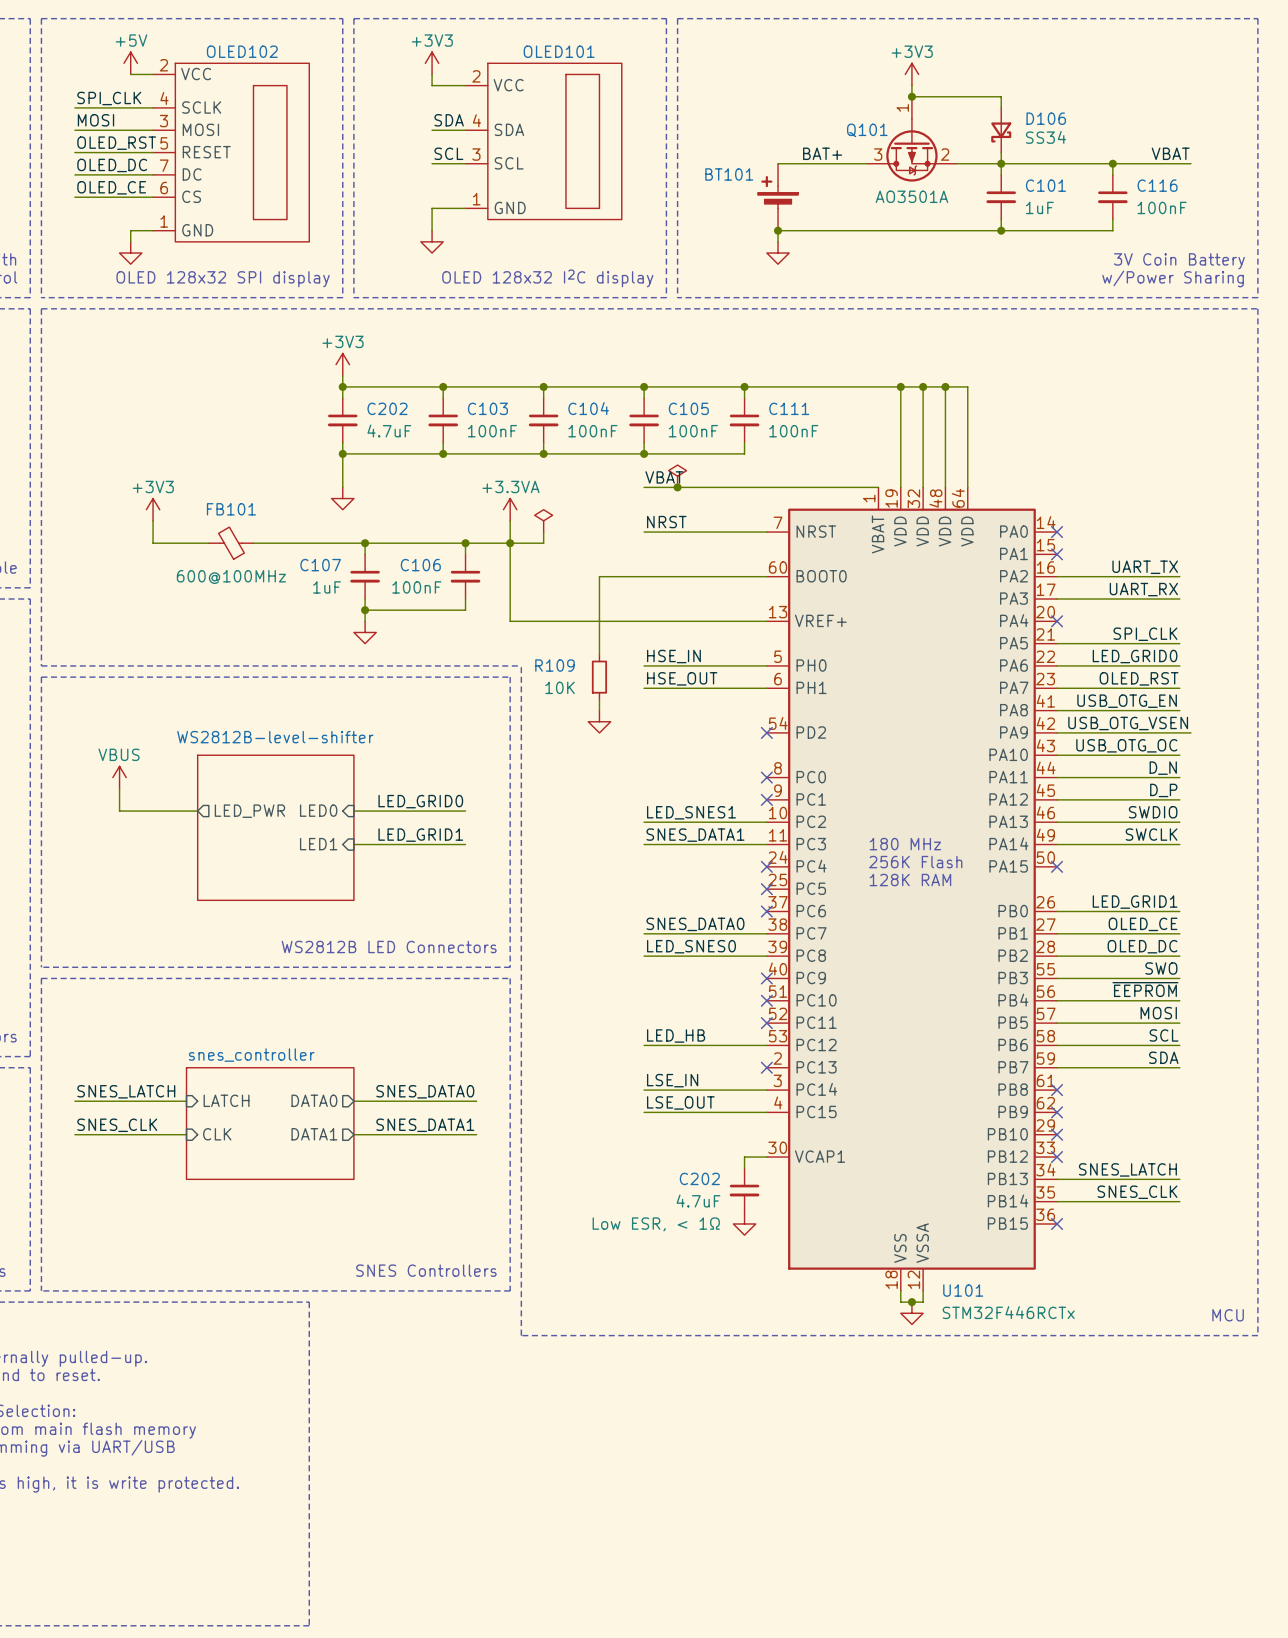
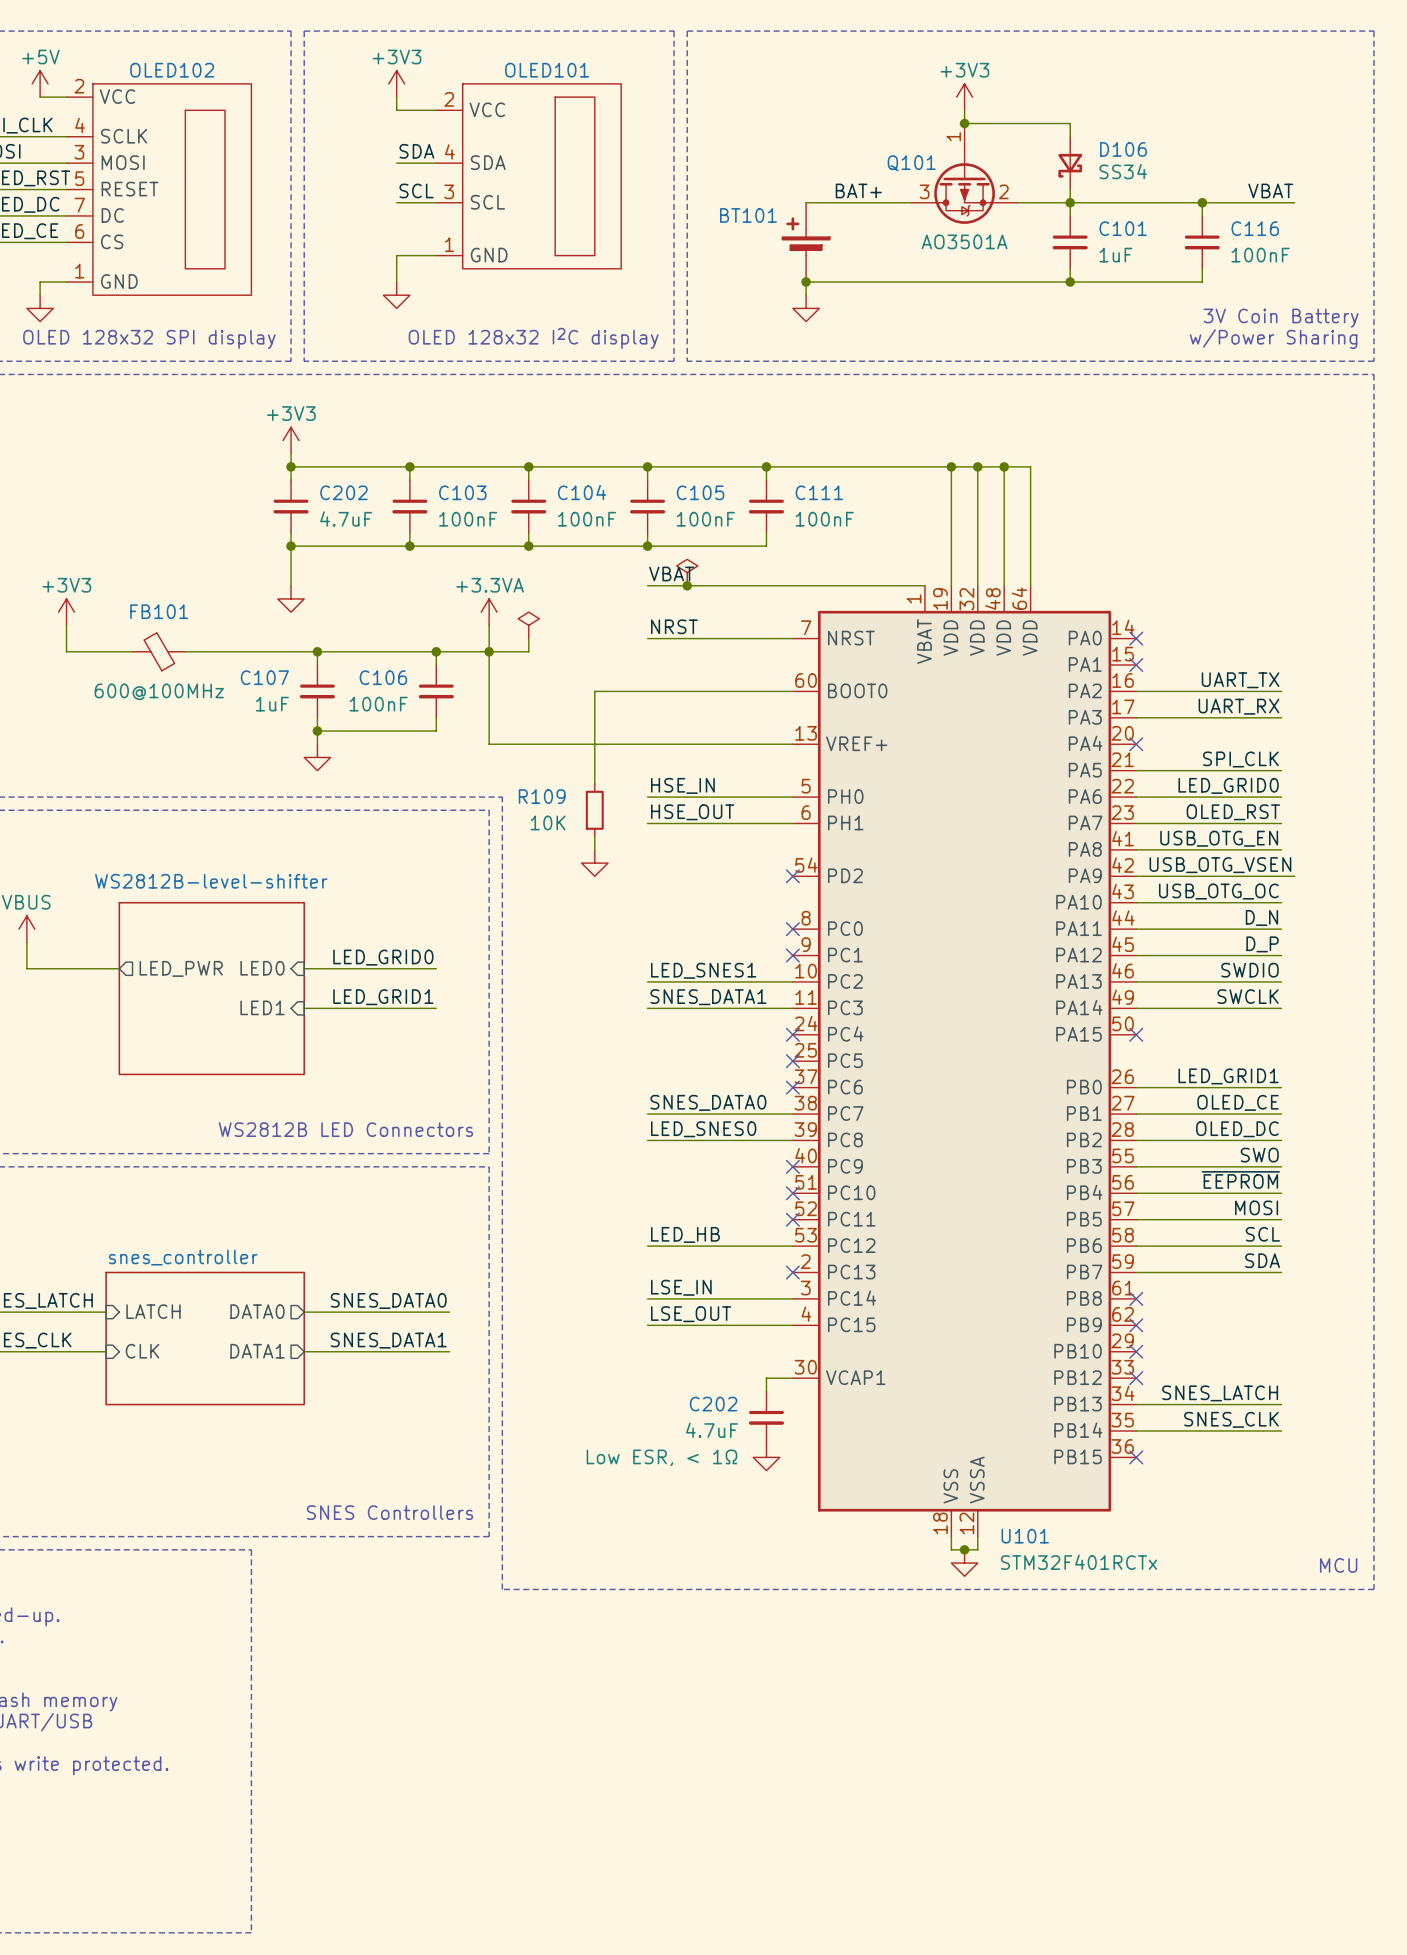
text: 180 MHz (905, 844) -> none
text: 256K Flash (915, 862) -> none
text: 128K RAM (910, 880) -> none
U101 value: STM32F446RCTx (1008, 1312) -> STM32F401RCTx (1079, 1562)

